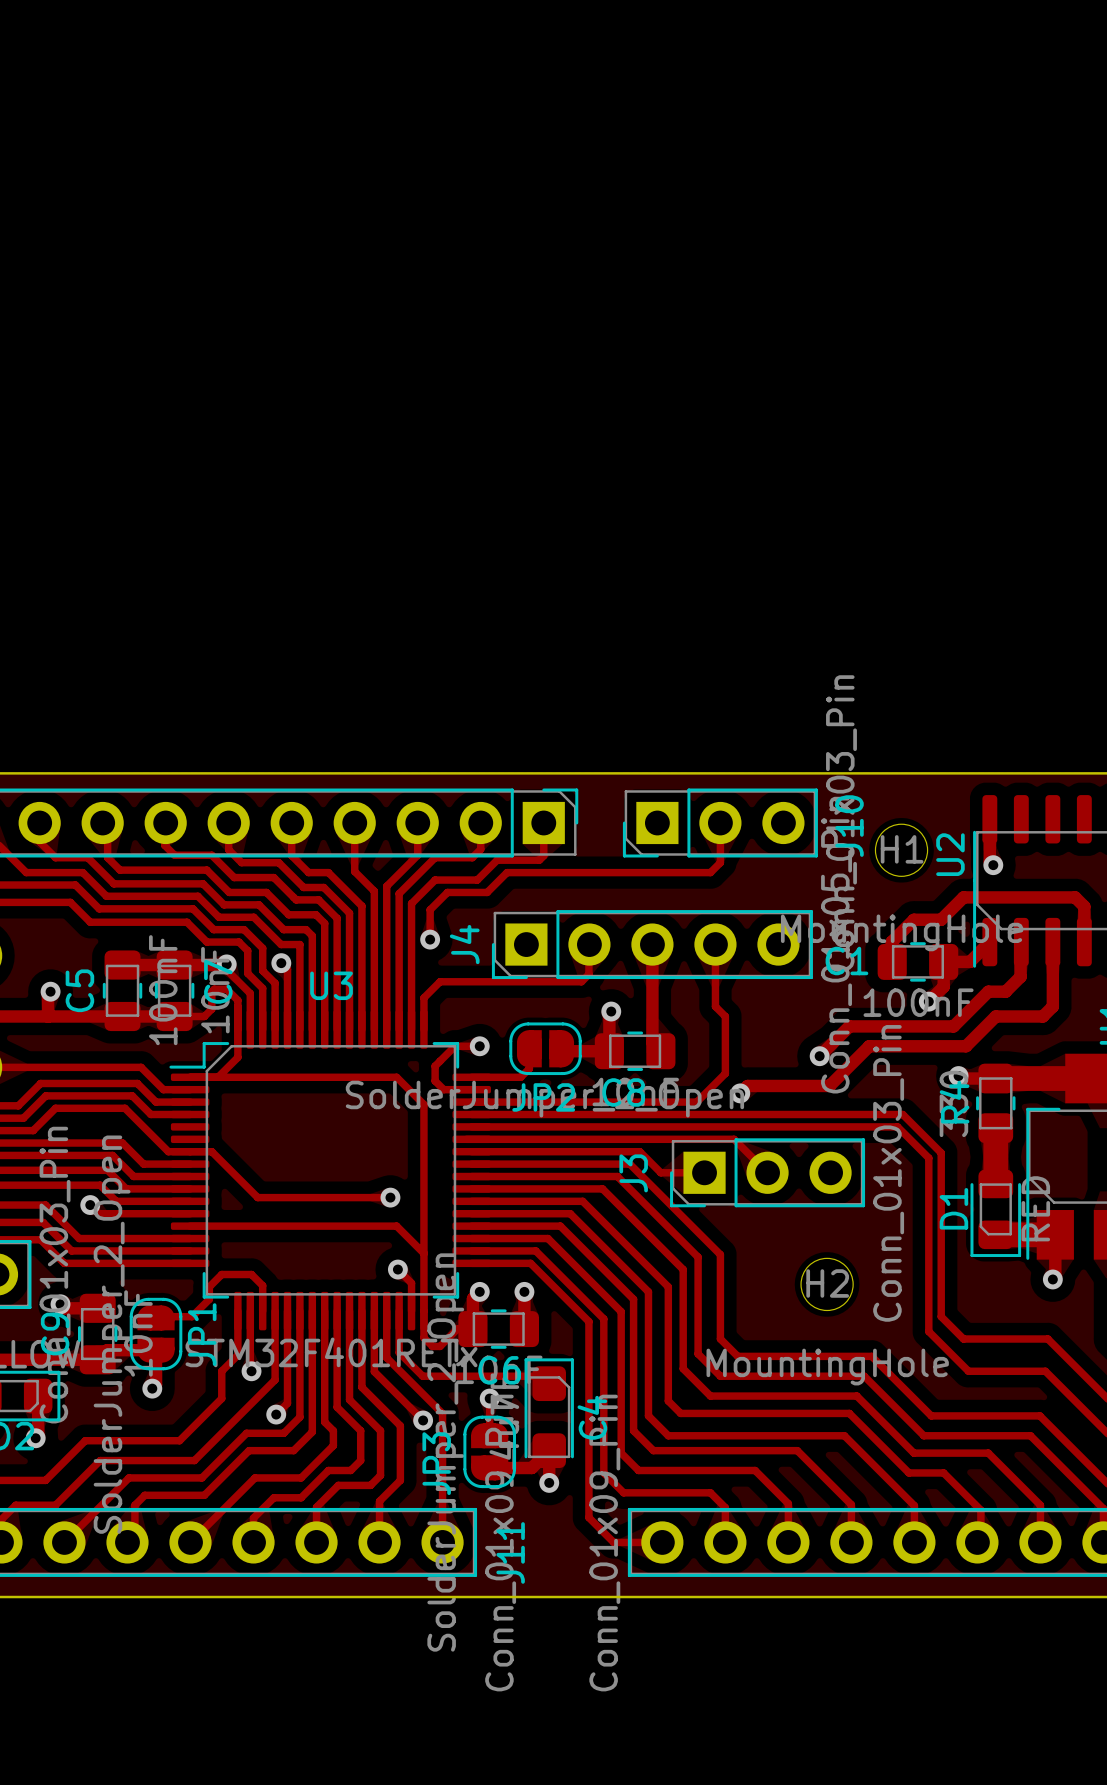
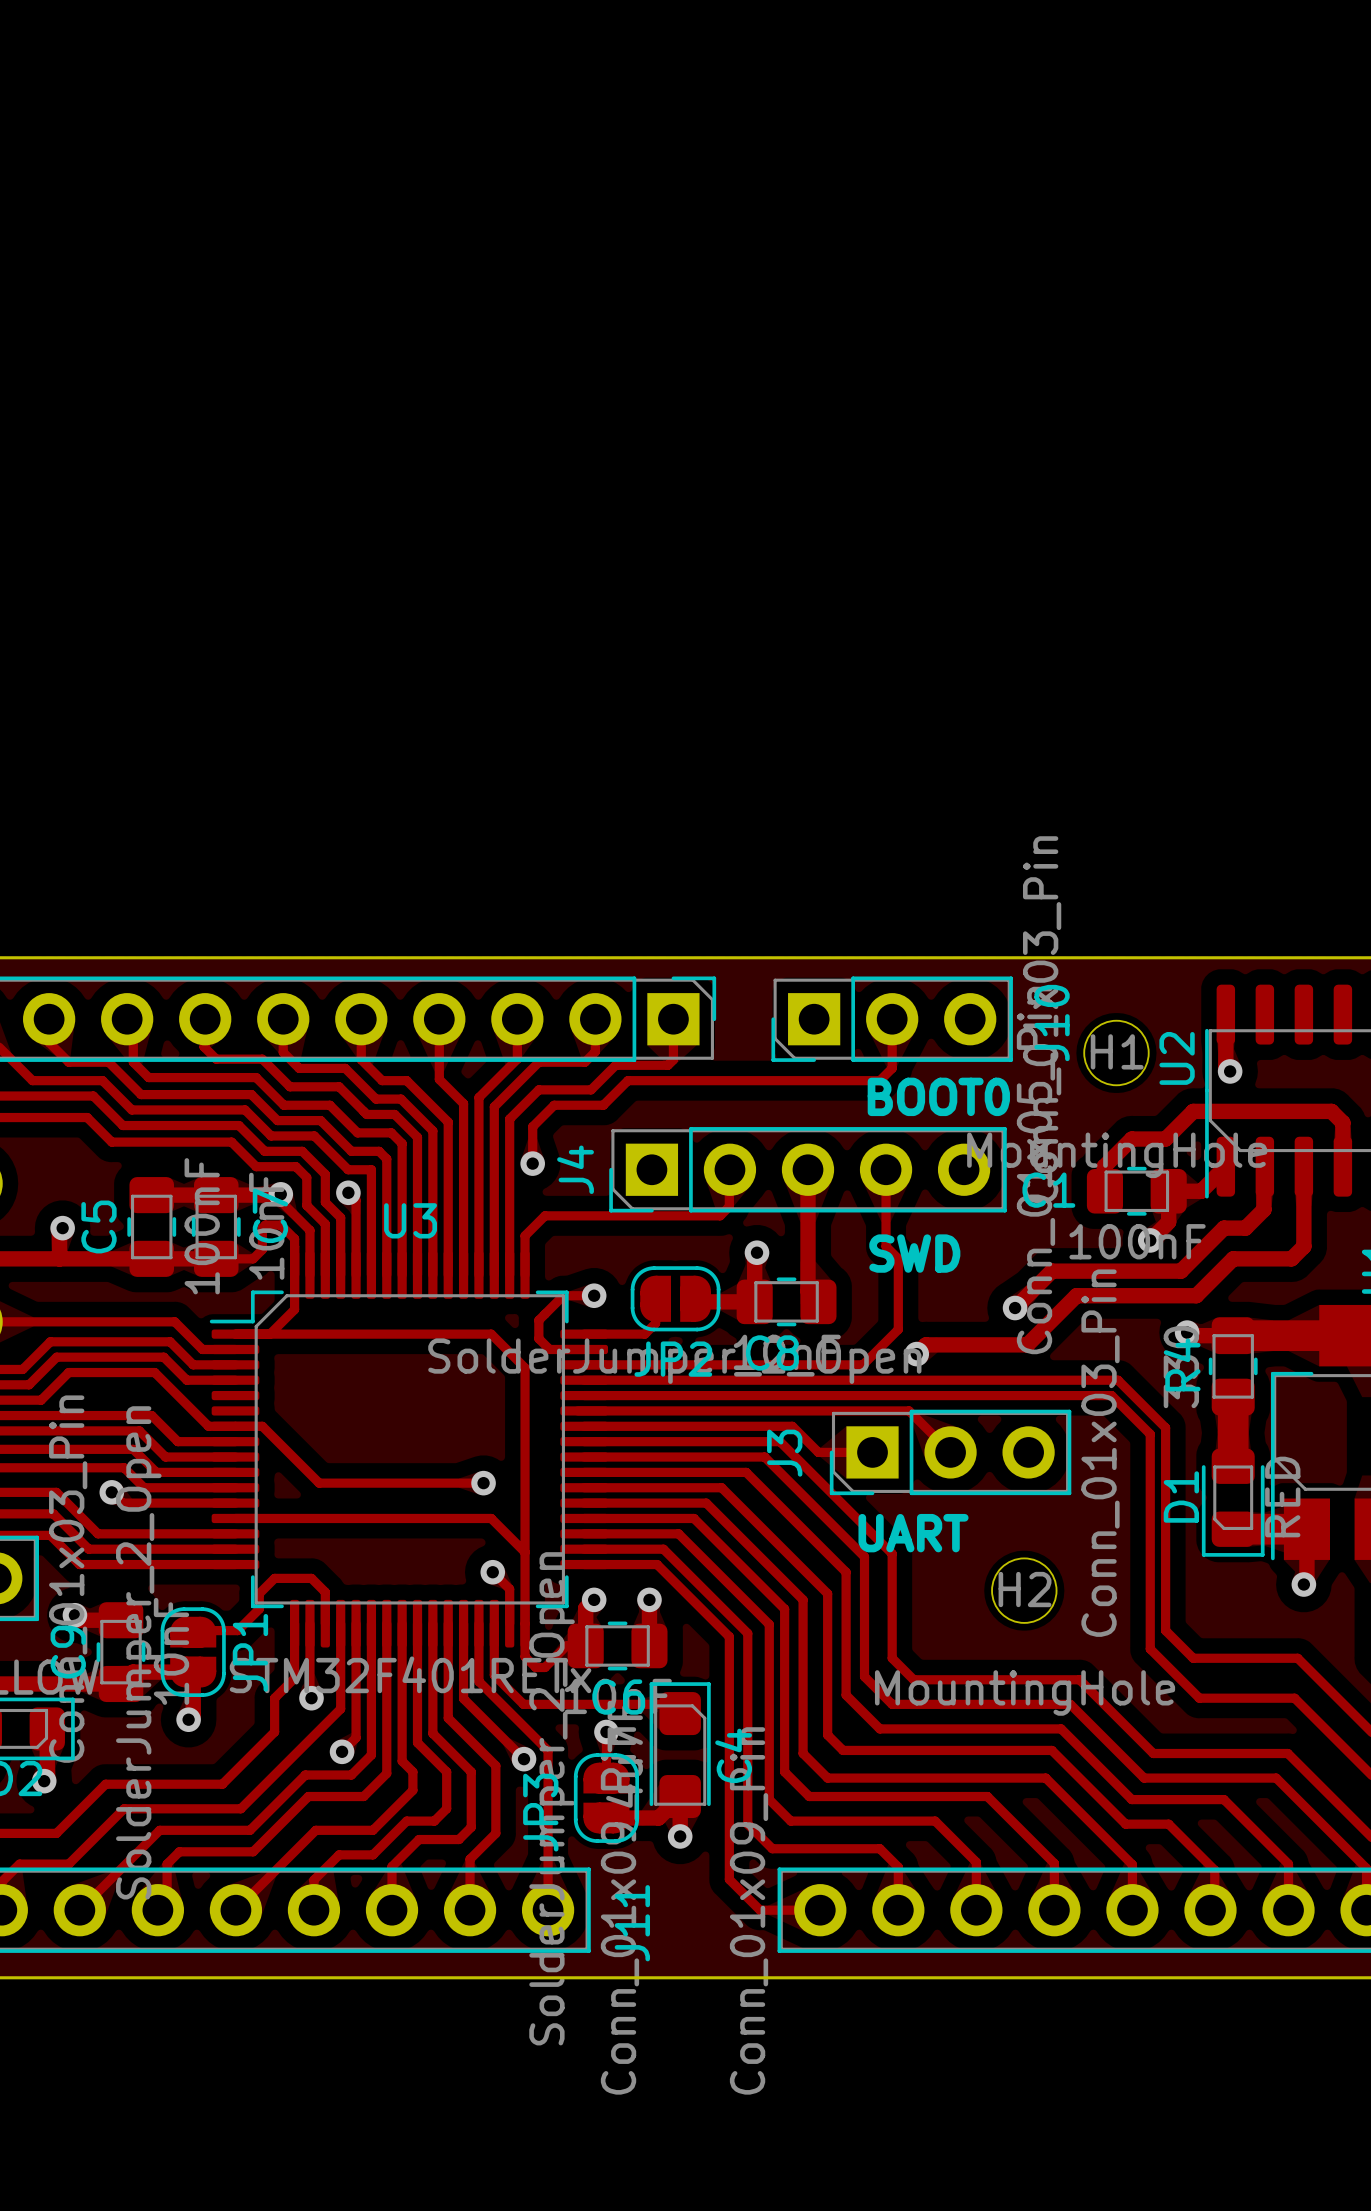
text: none -> BOOT0 (938, 1096)
text: none -> SWD (914, 1253)
text: none -> UART (913, 1533)

